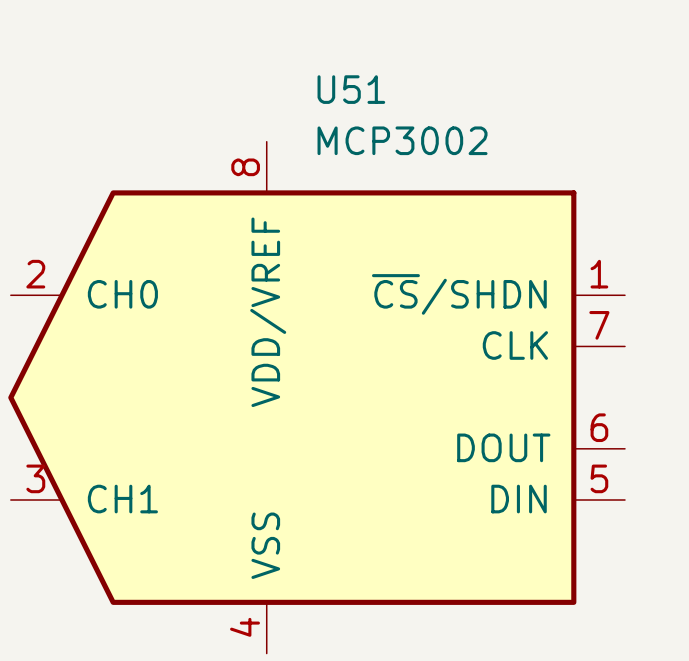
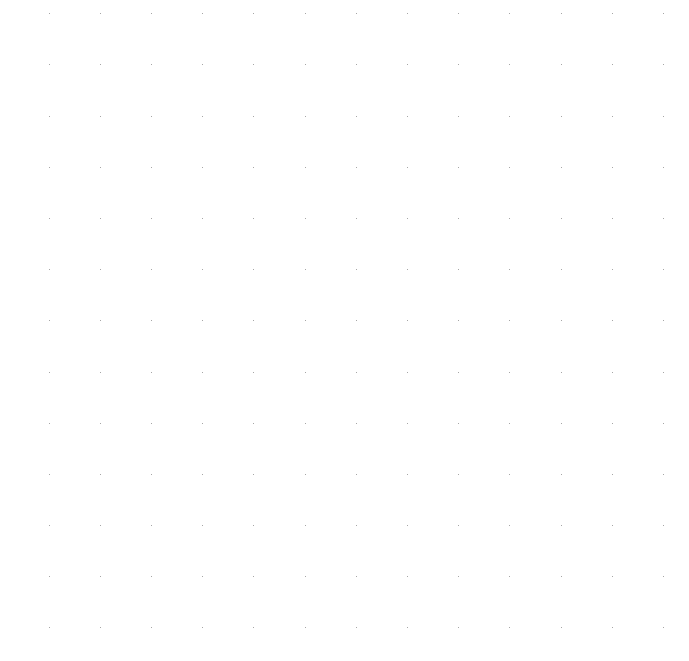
U51: MCP3002 (316, 397) -> none

